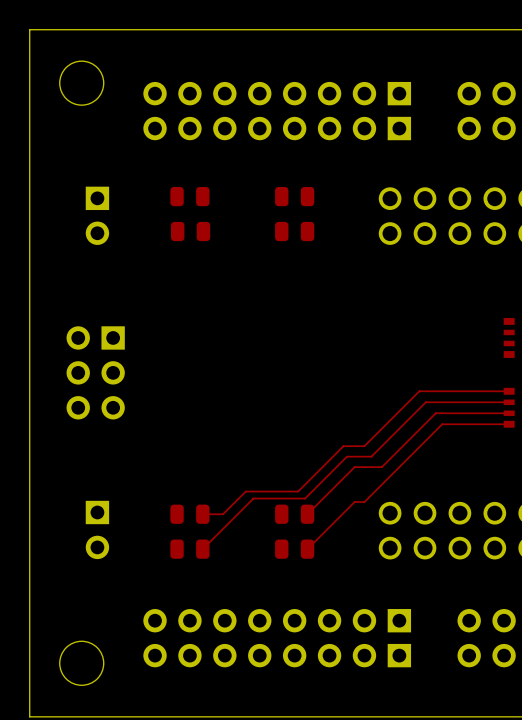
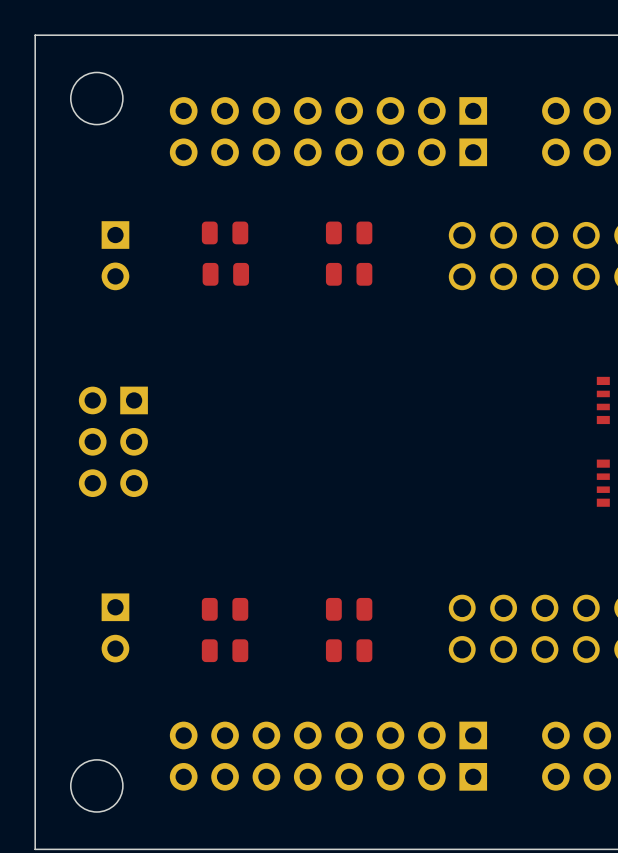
top track: (509, 391) (419, 391) (364, 446) (343, 446) (298, 491) (245, 491) (223, 514) (202, 514) -> none
top track: (509, 402) (425, 402) (371, 456) (347, 456) (305, 498) (253, 498) (202, 549) -> none
top track: (509, 413) (435, 413) (381, 467) (354, 467) (307, 514) -> none
top track: (509, 424) (442, 424) (364, 502) (354, 502) (307, 549) -> none

